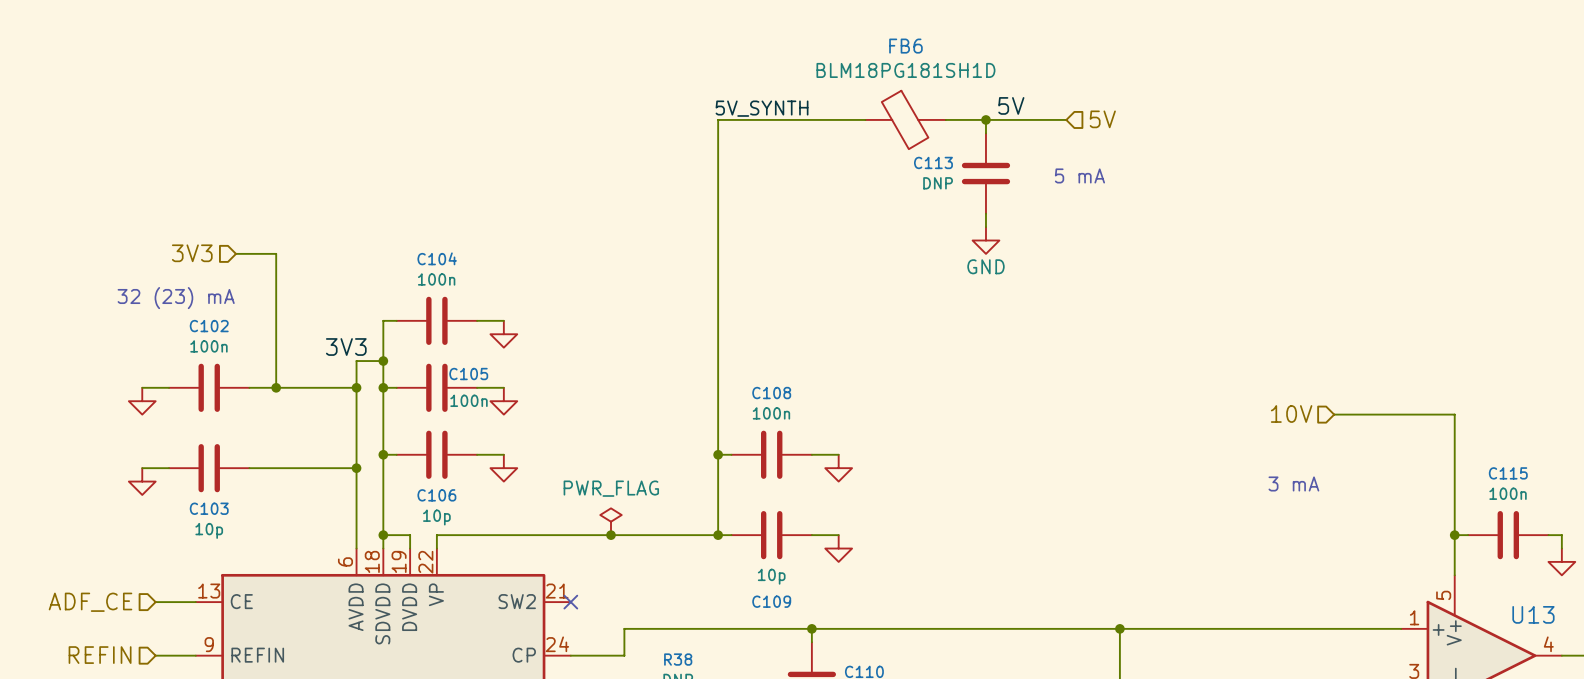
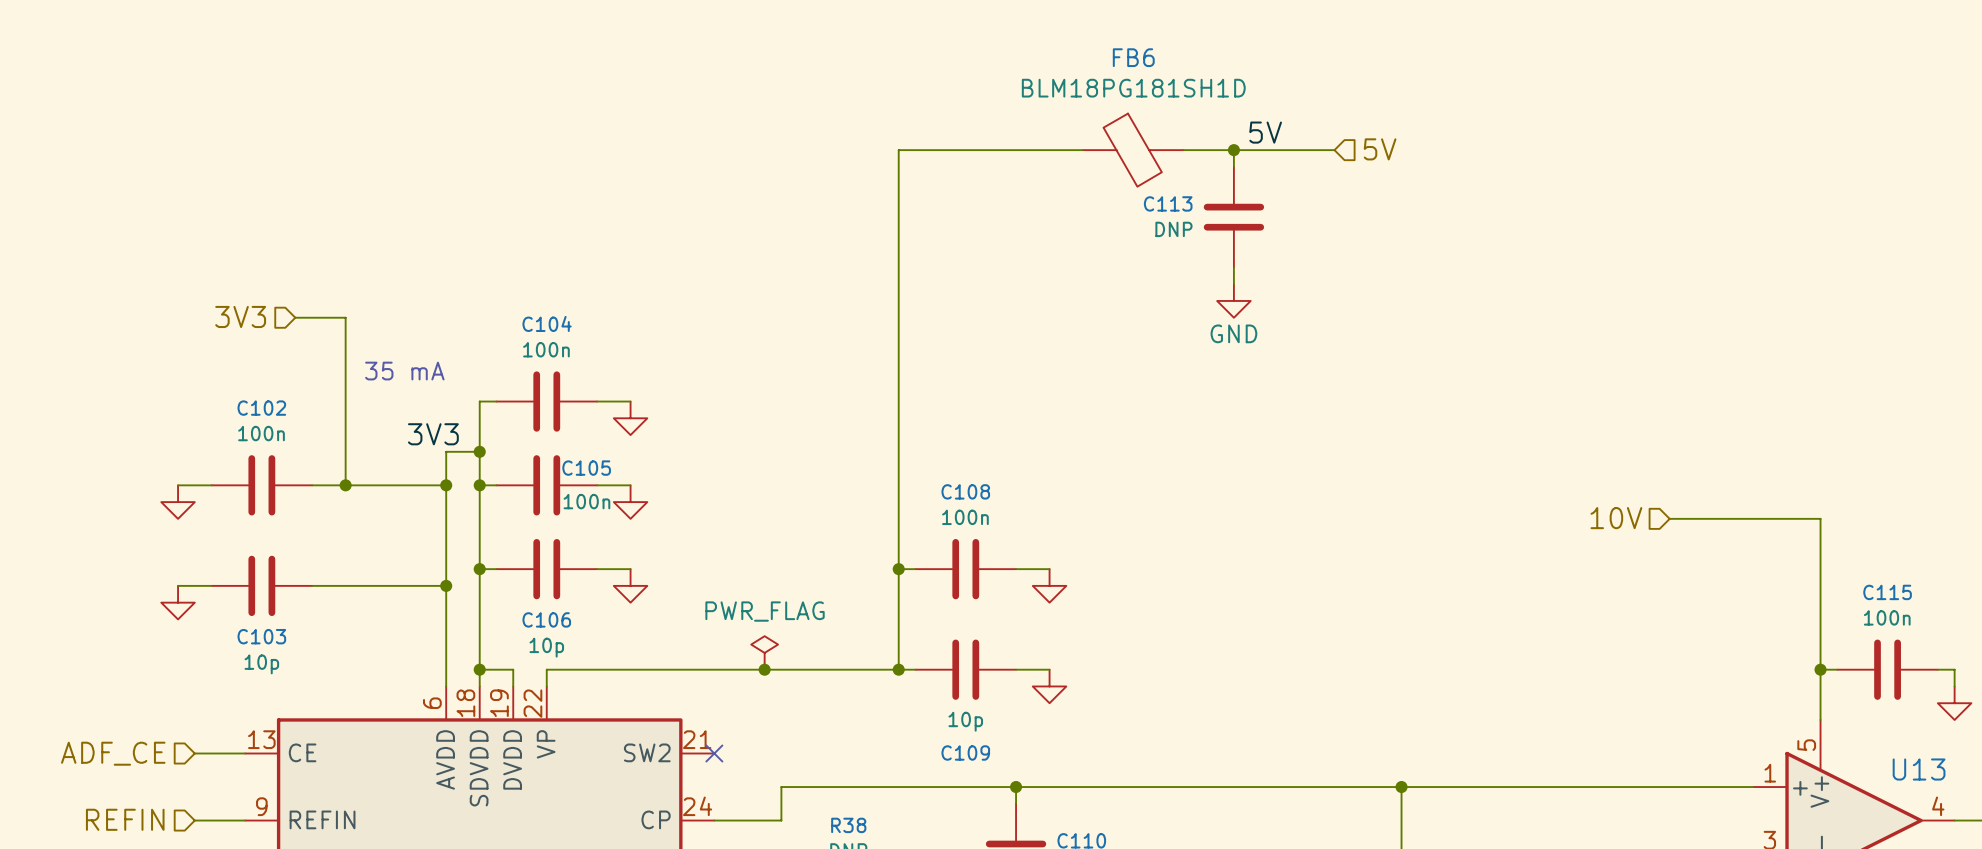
label: 5V_SYNTH (762, 108) -> none
text: 5 mA (1079, 175) -> none
text: none -> 35 mA (404, 371)
text: 32 (23) mA (176, 298) -> none
text: 3 mA (1293, 483) -> none

